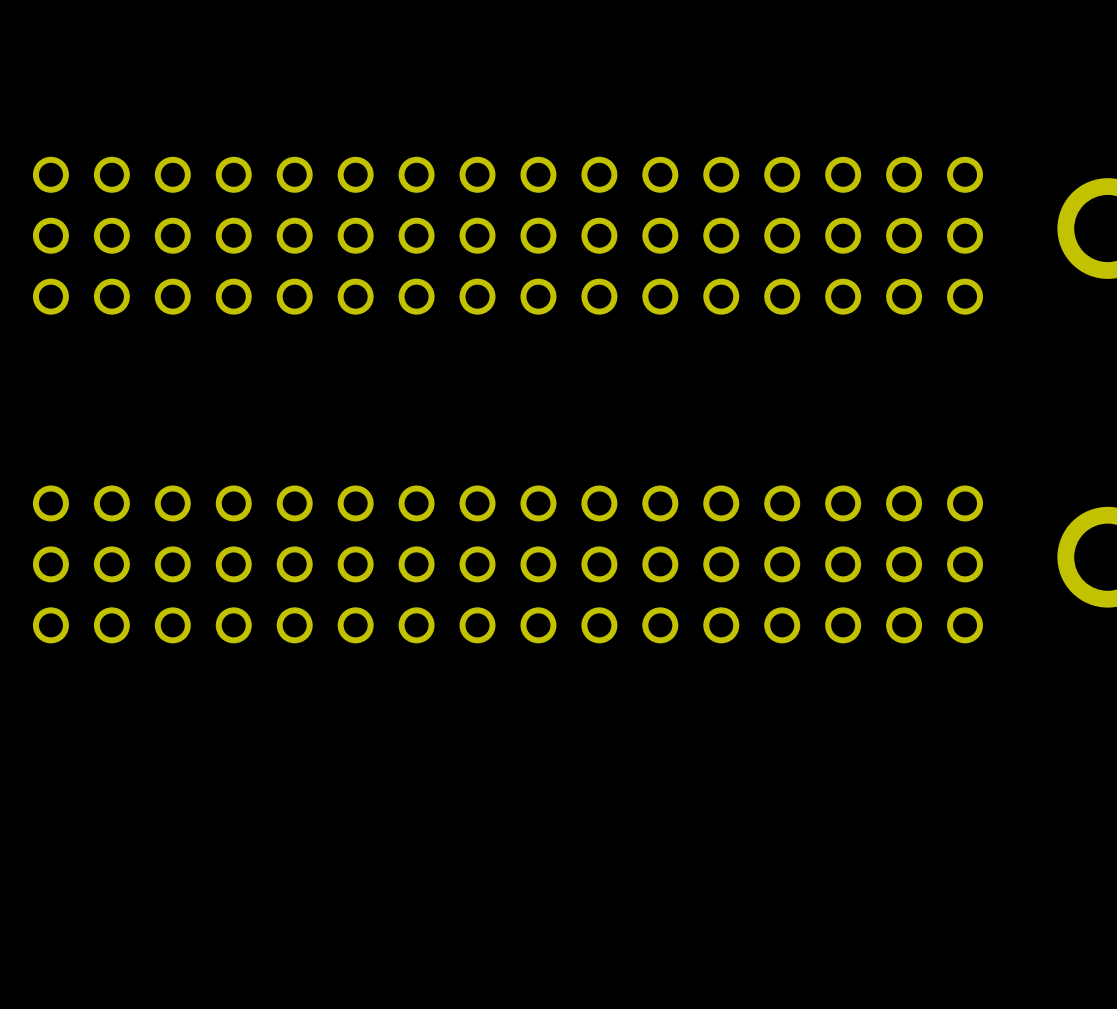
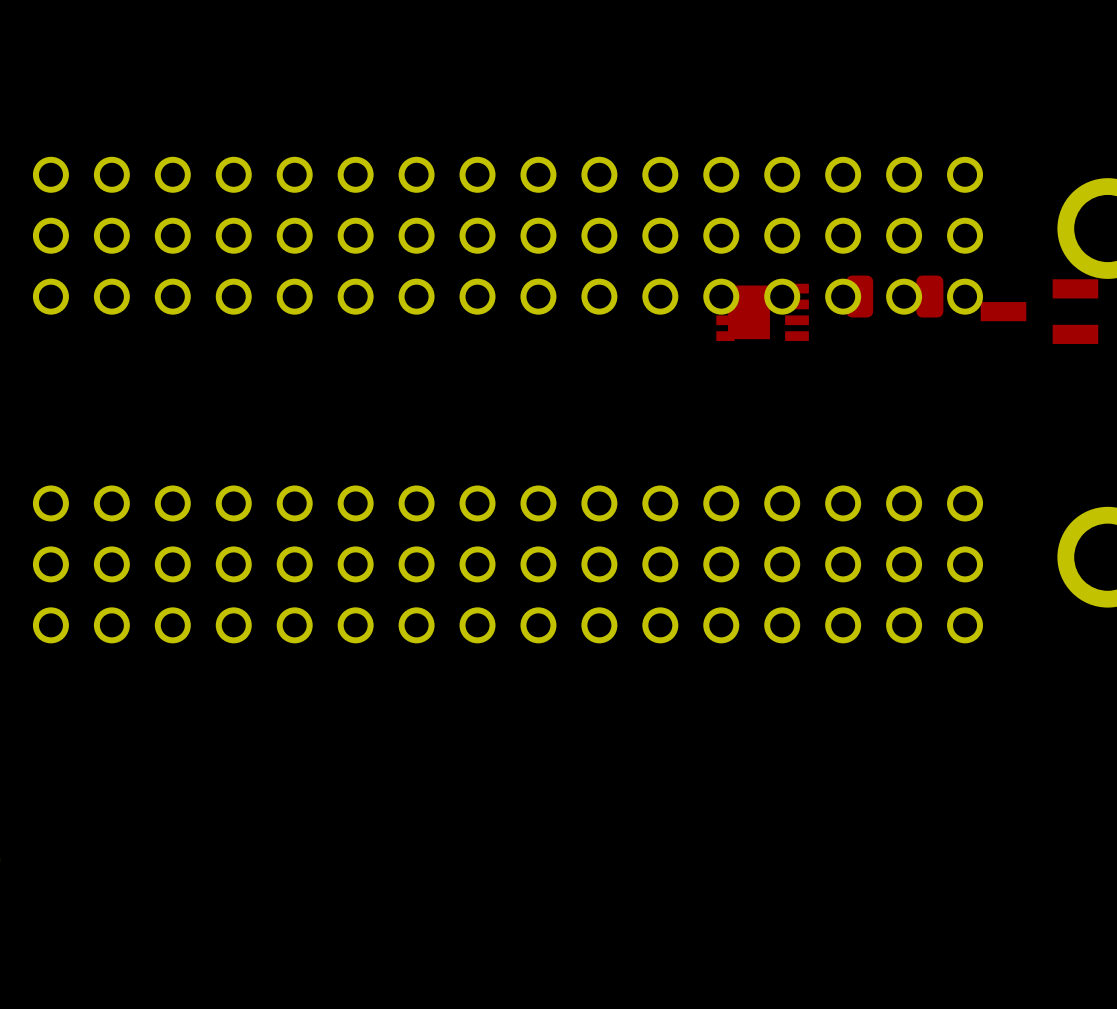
part: none -> (894, 296)
part: none -> (1039, 311)
part: none -> (762, 312)

